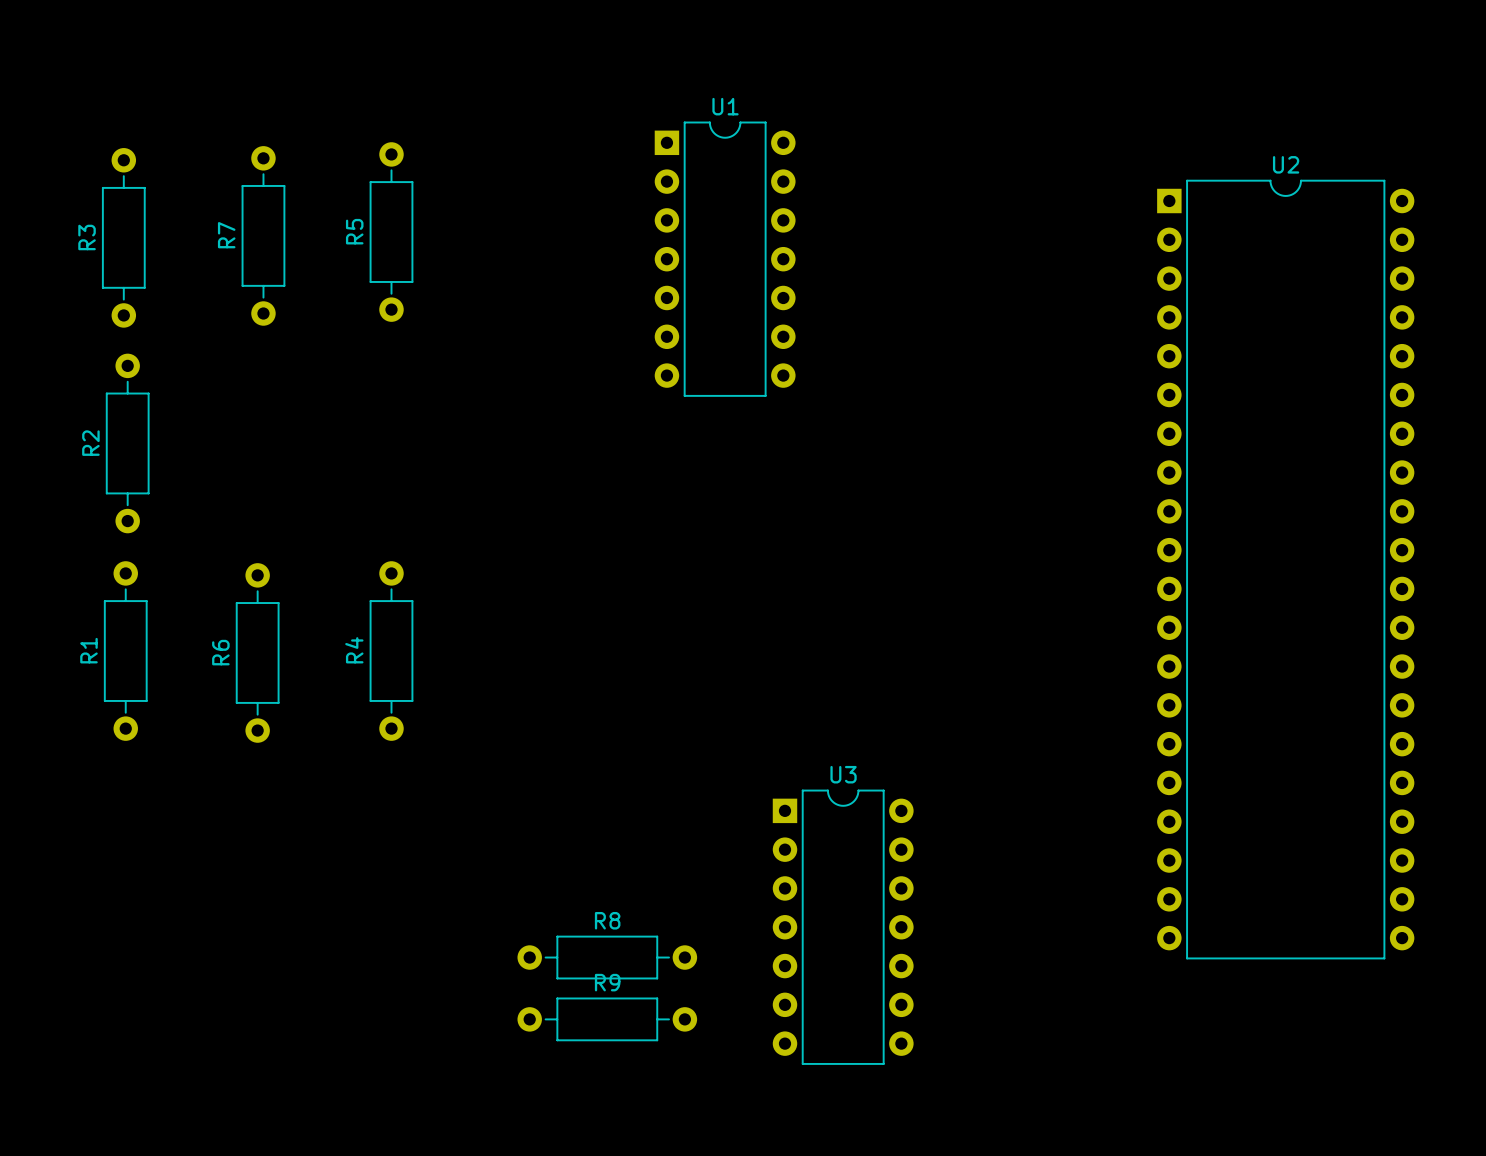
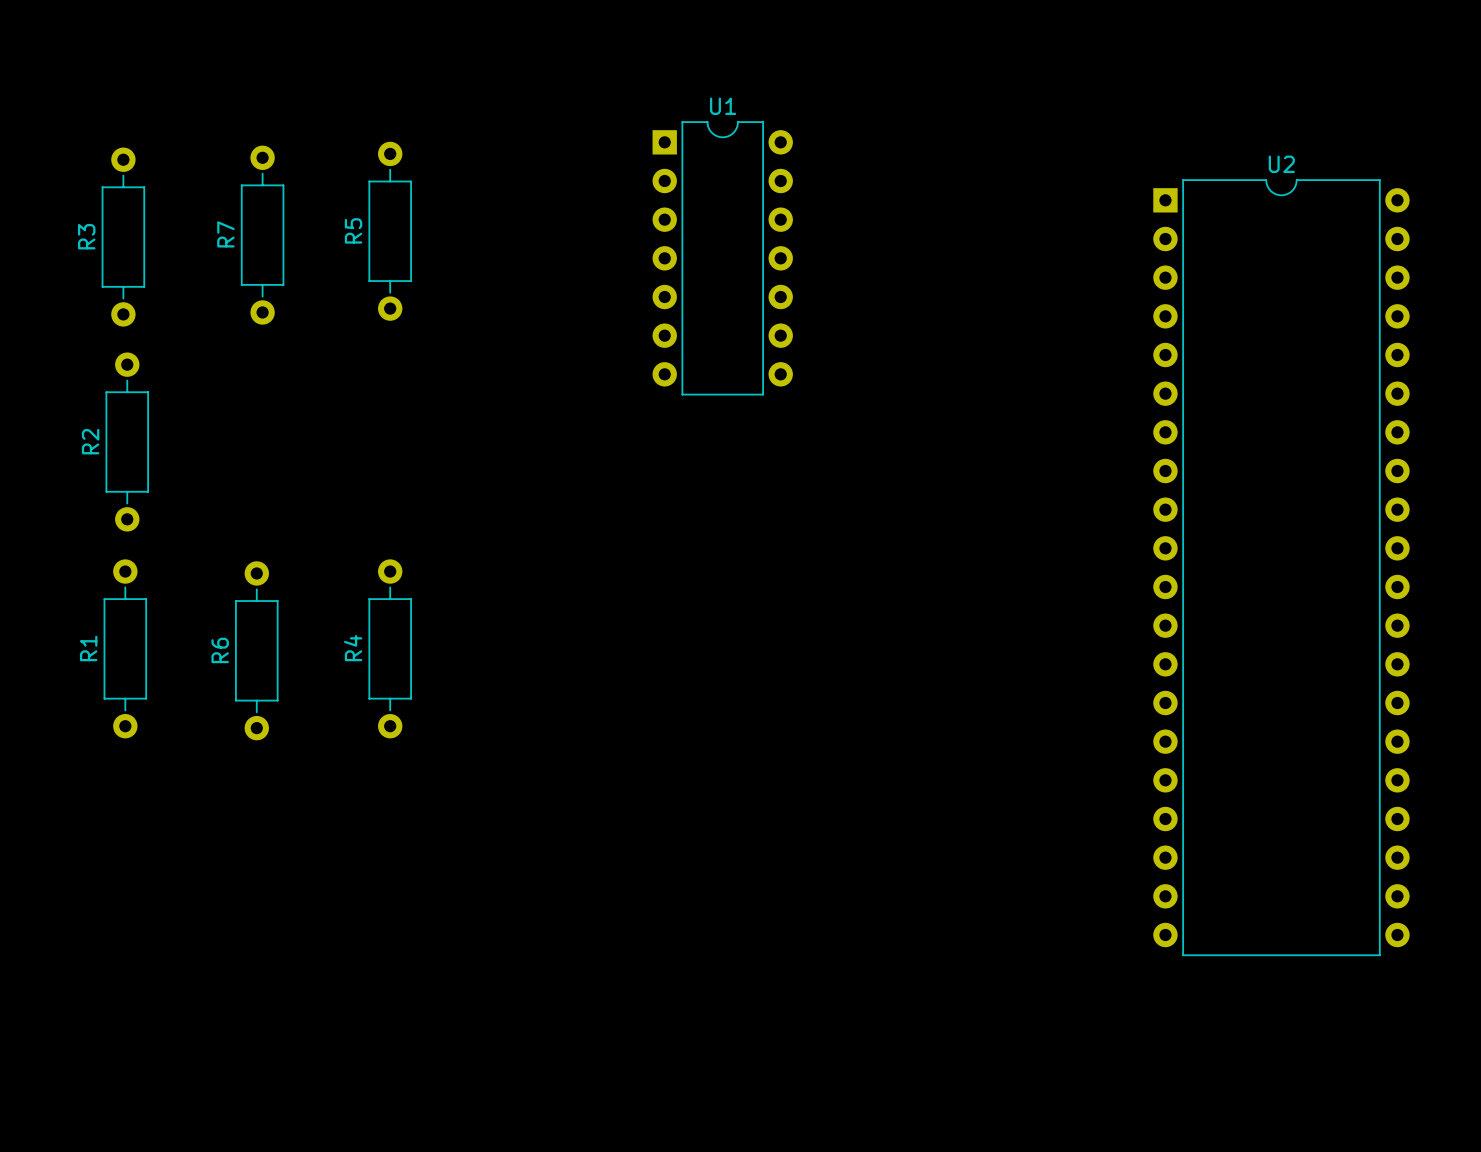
U3: (843, 927) -> none
R8: (607, 957) -> none
R9: (607, 1019) -> none

